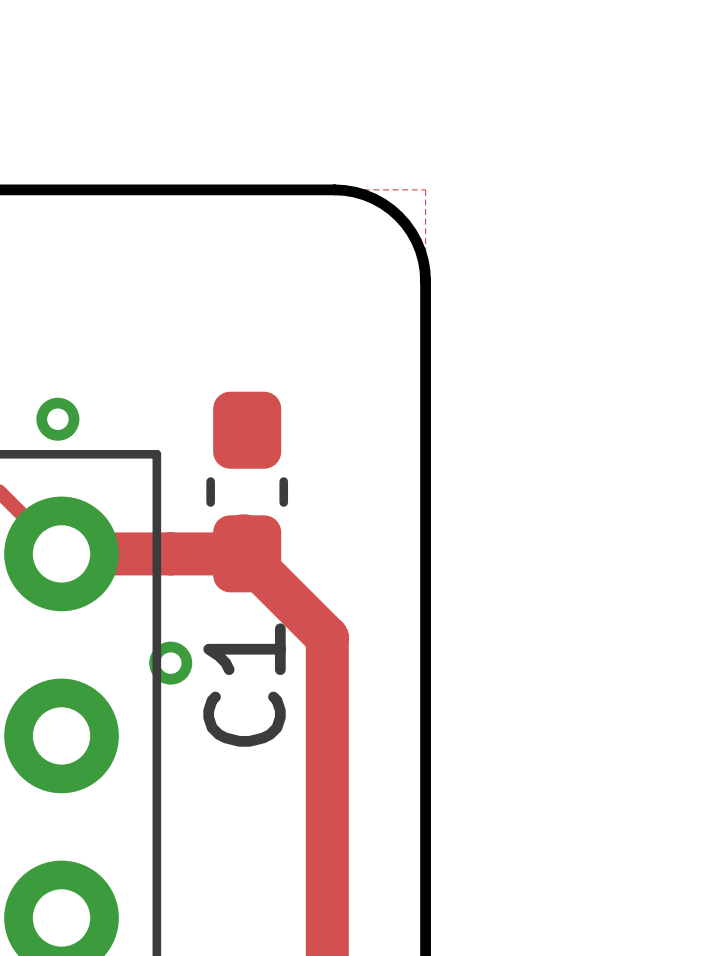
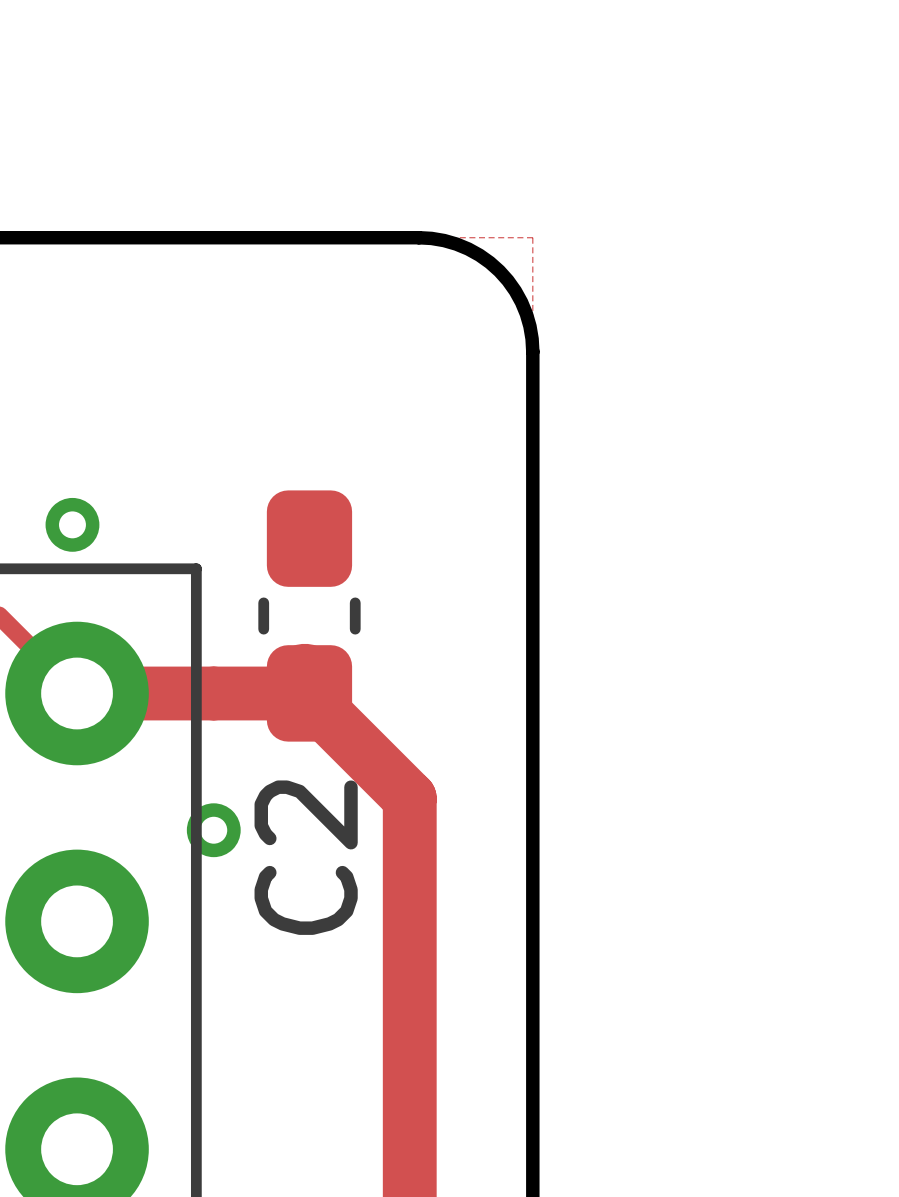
C1 name: C1 (244, 685) -> C2 (306, 857)

